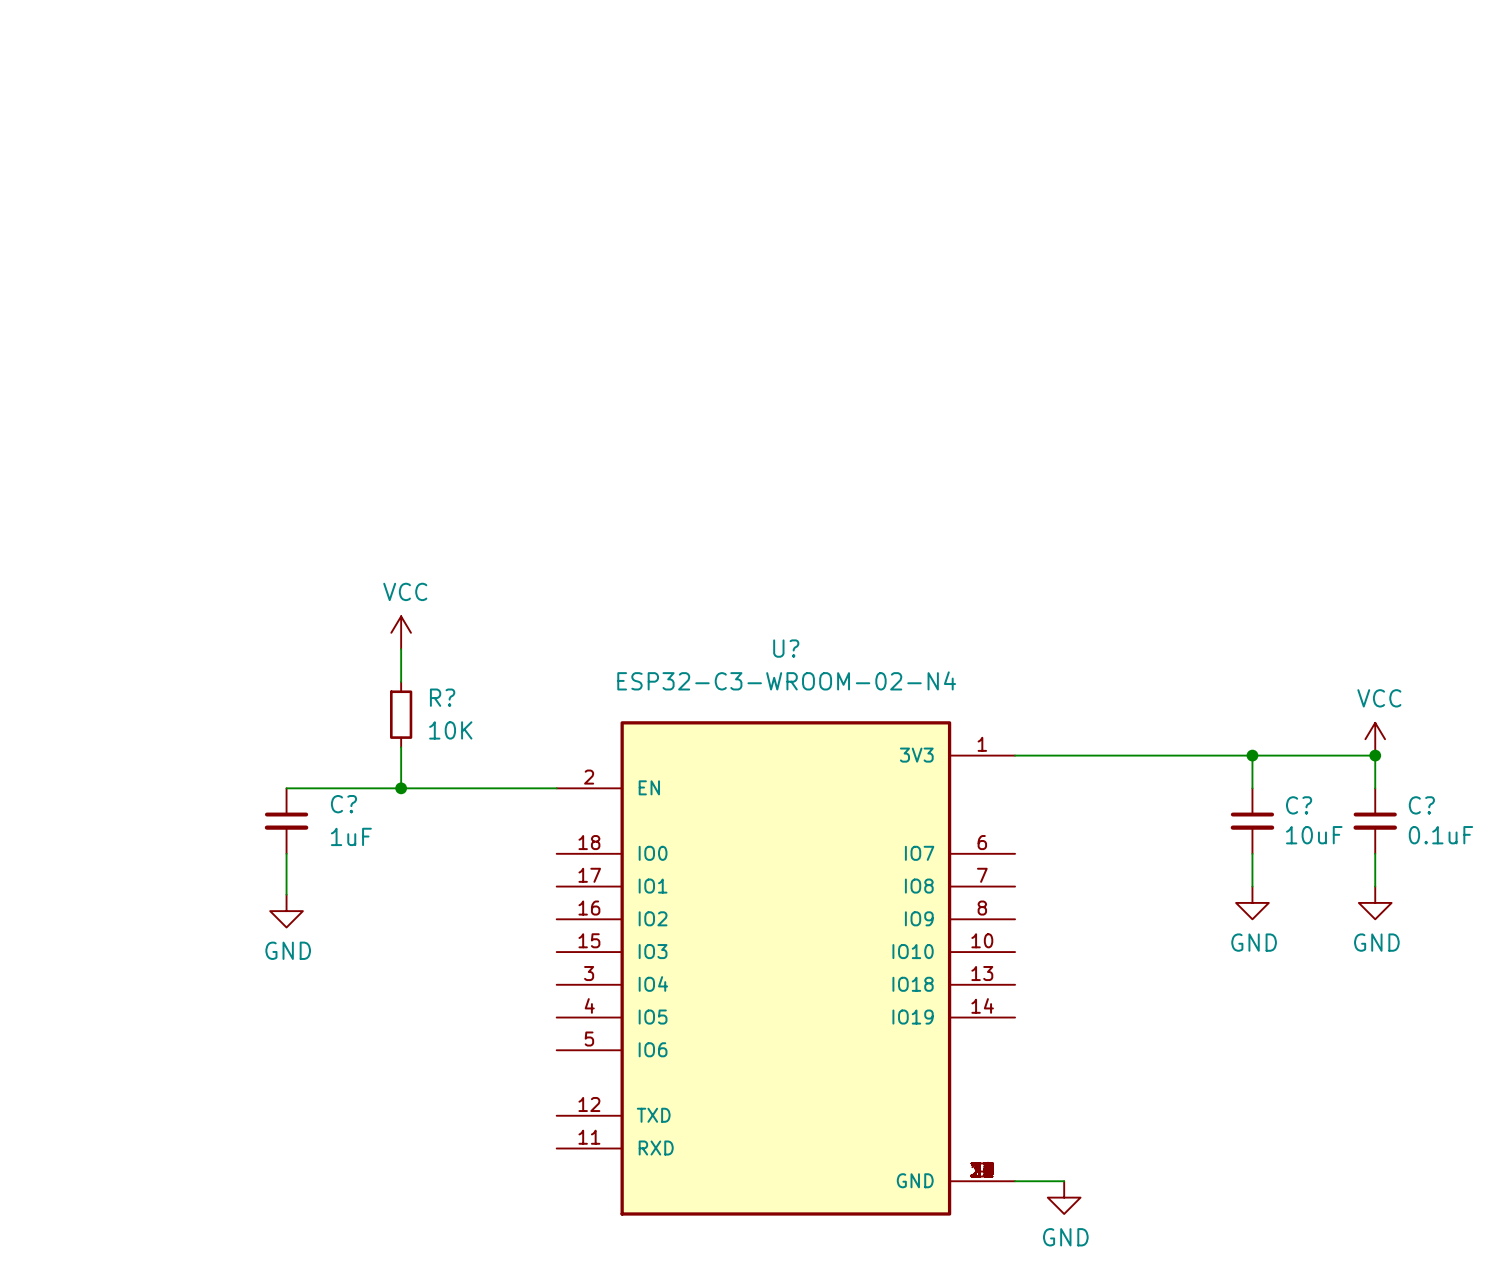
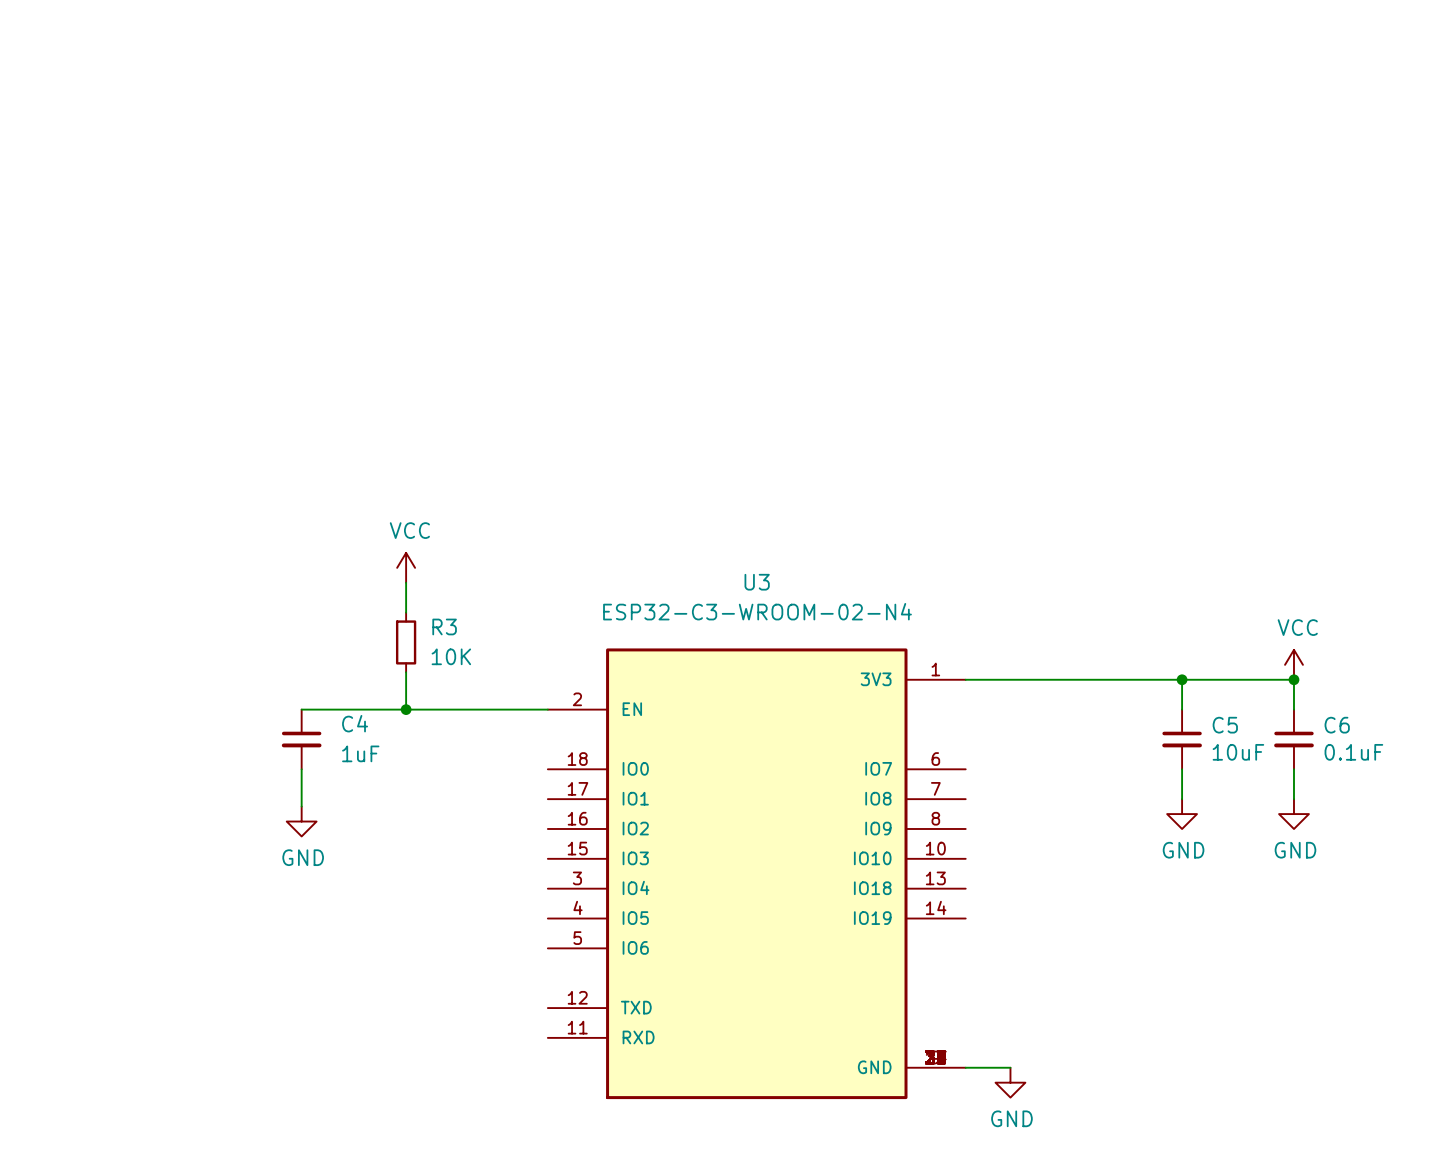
U? name: U? (786, 648) -> U3 (757, 582)
R? name: R? (442, 697) -> R3 (444, 626)
C? name: C? (343, 804) -> C4 (355, 723)
C? name: C? (1299, 805) -> C5 (1225, 725)
C? name: C? (1421, 805) -> C6 (1337, 725)

